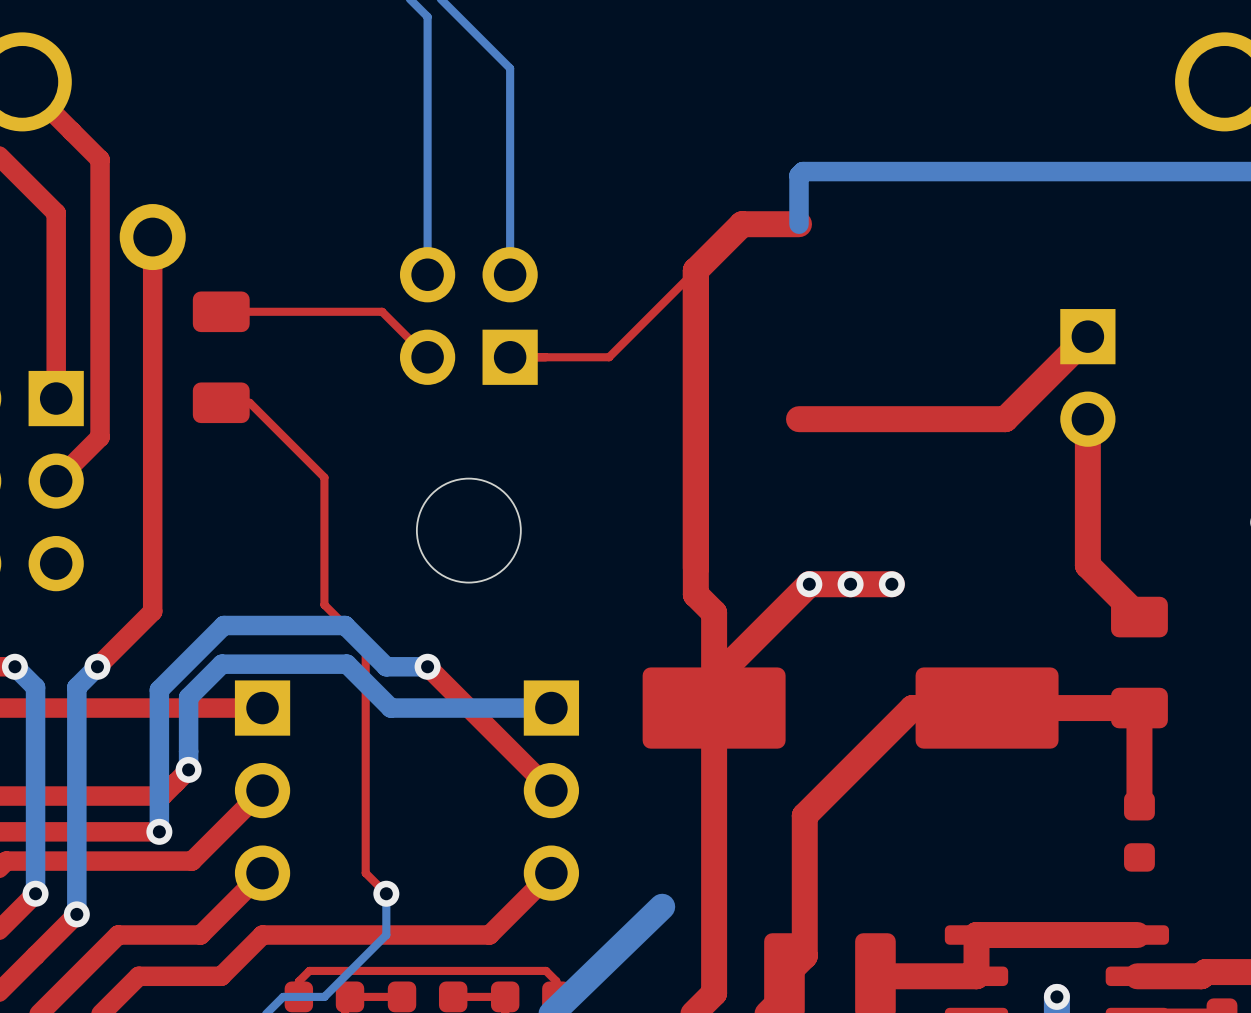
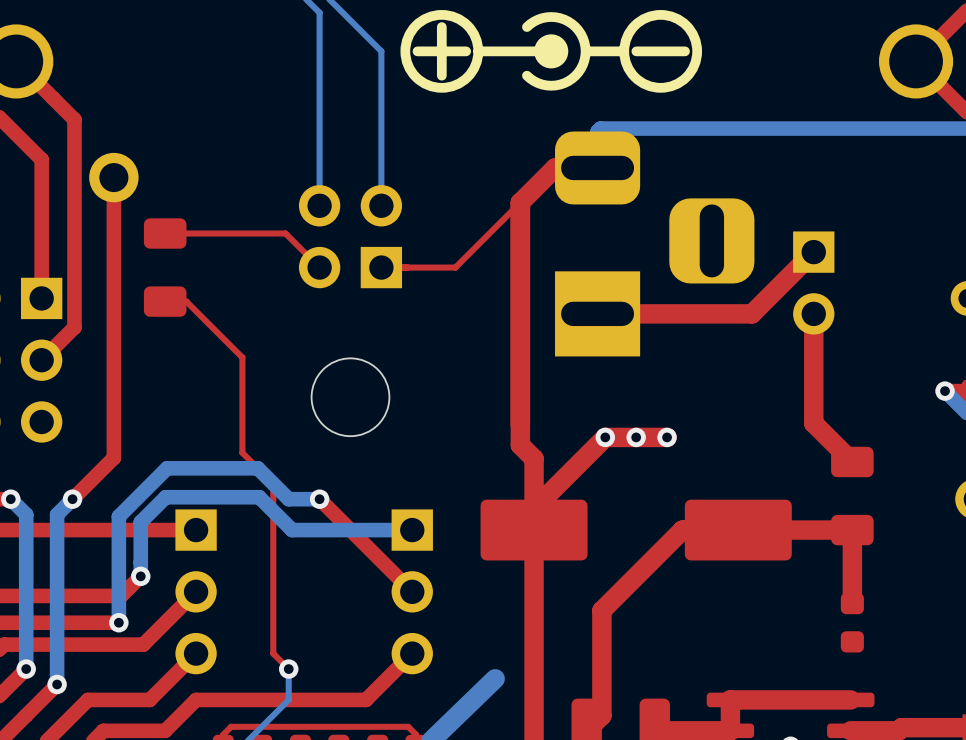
drawing: none -> [400, 10, 703, 93]
part: none -> (654, 243)

